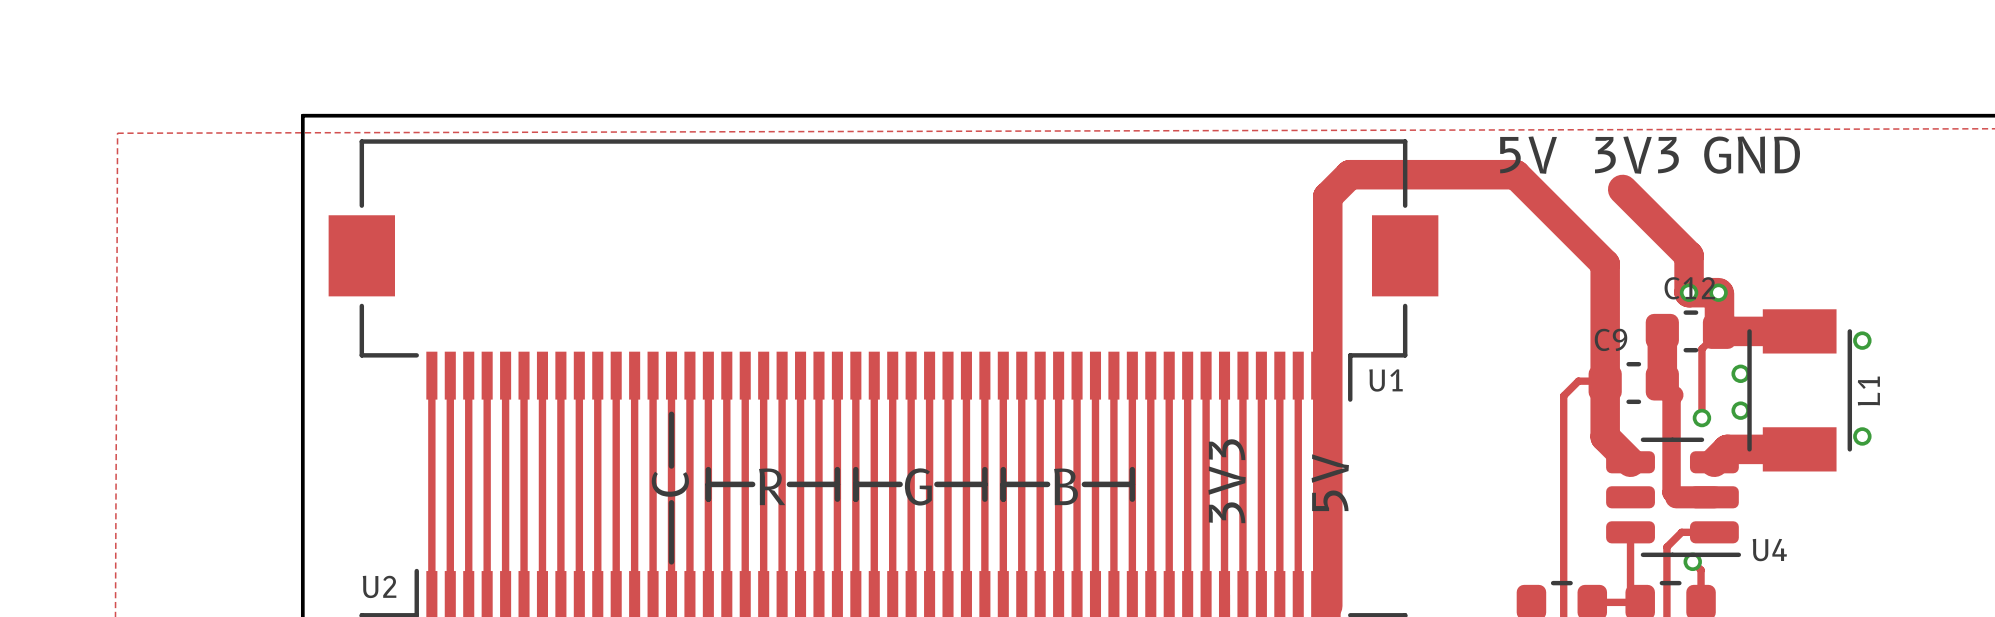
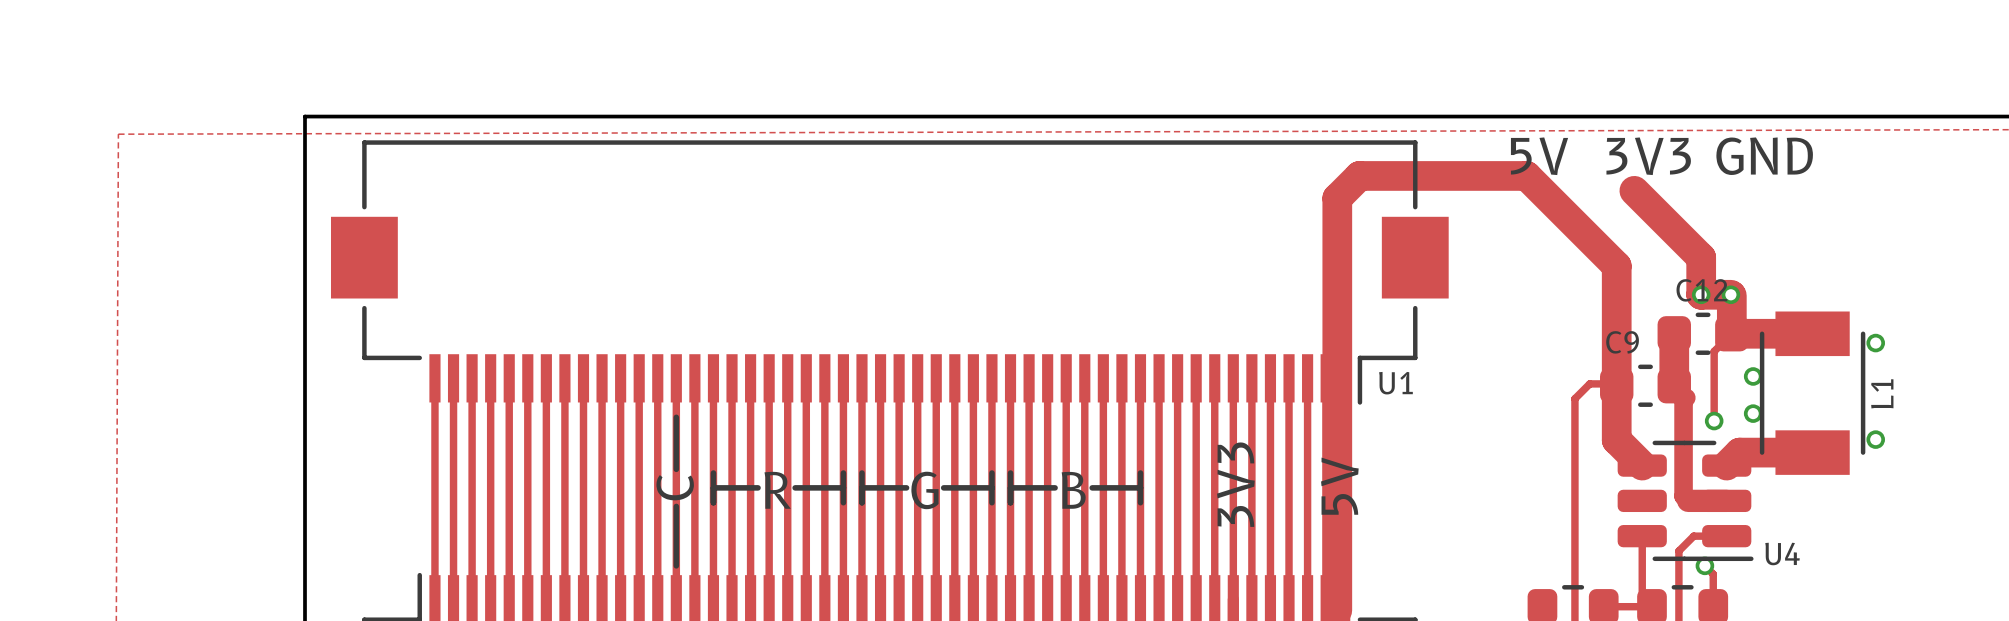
U2 name: U2 (379, 586) -> none

